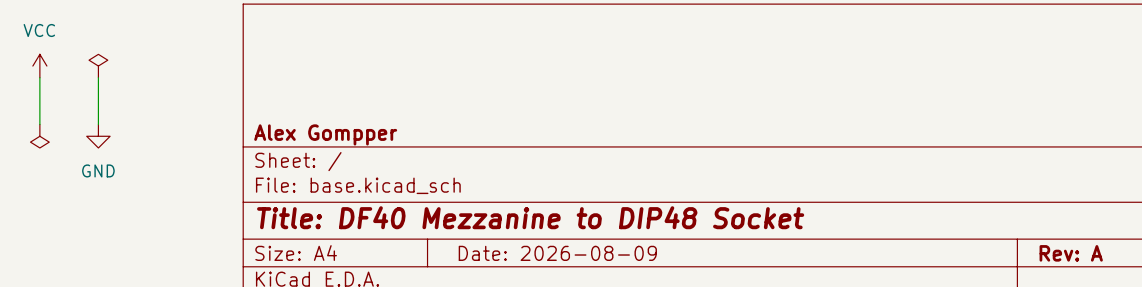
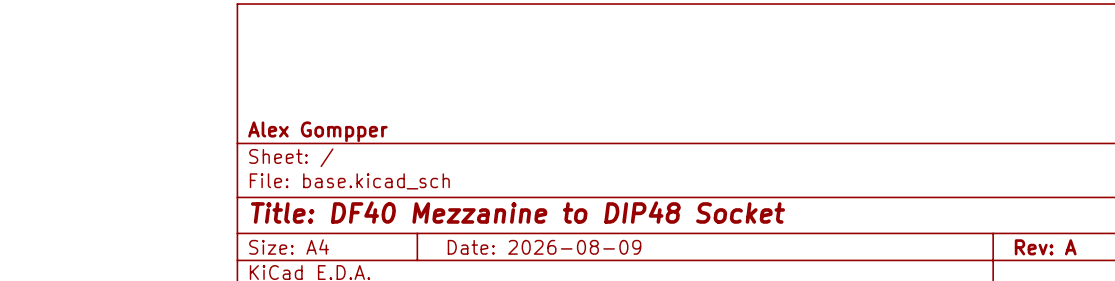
power symbol: VCC (39, 66) -> none
power symbol: (98, 66) -> none
wire: (39, 77) (39, 124) -> none
wire: (98, 77) (98, 124) -> none
power symbol: (39, 136) -> none
power symbol: GND (98, 136) -> none

